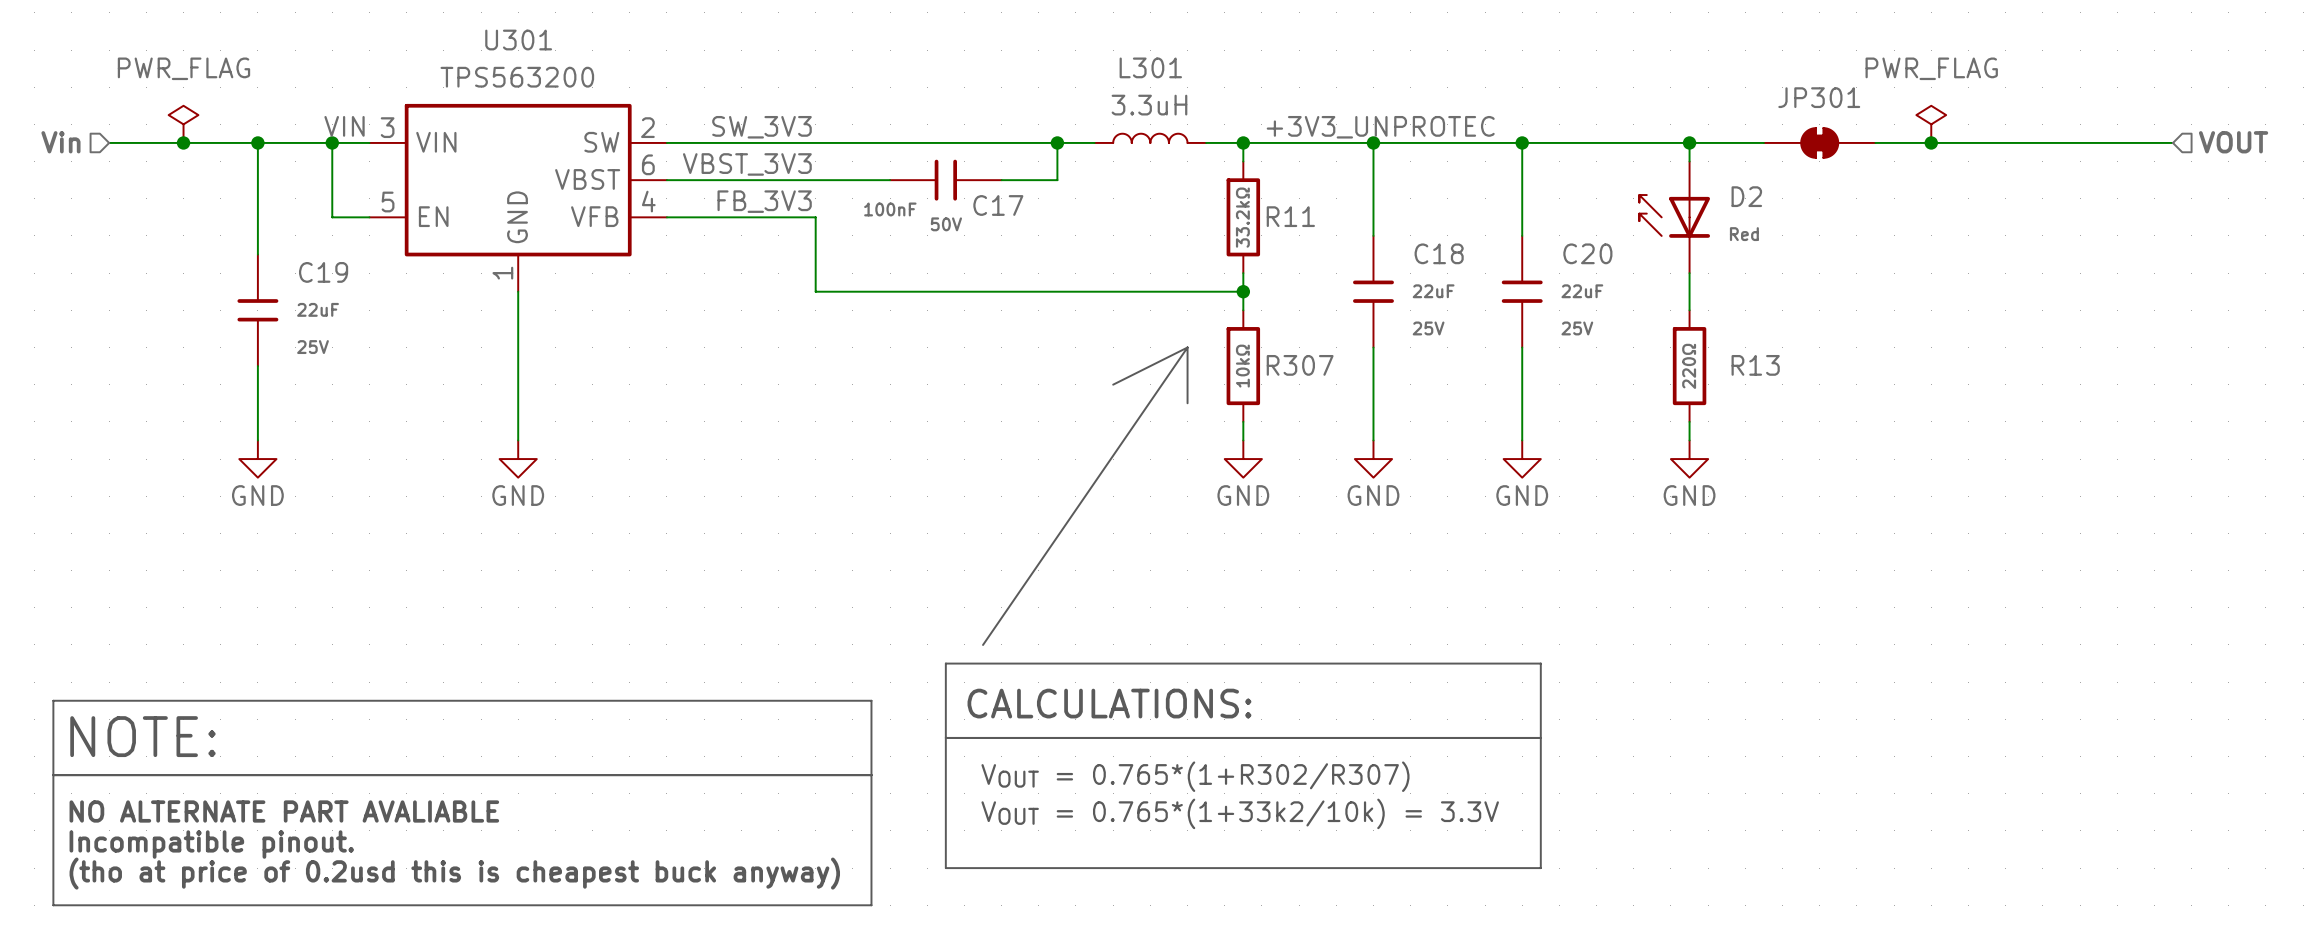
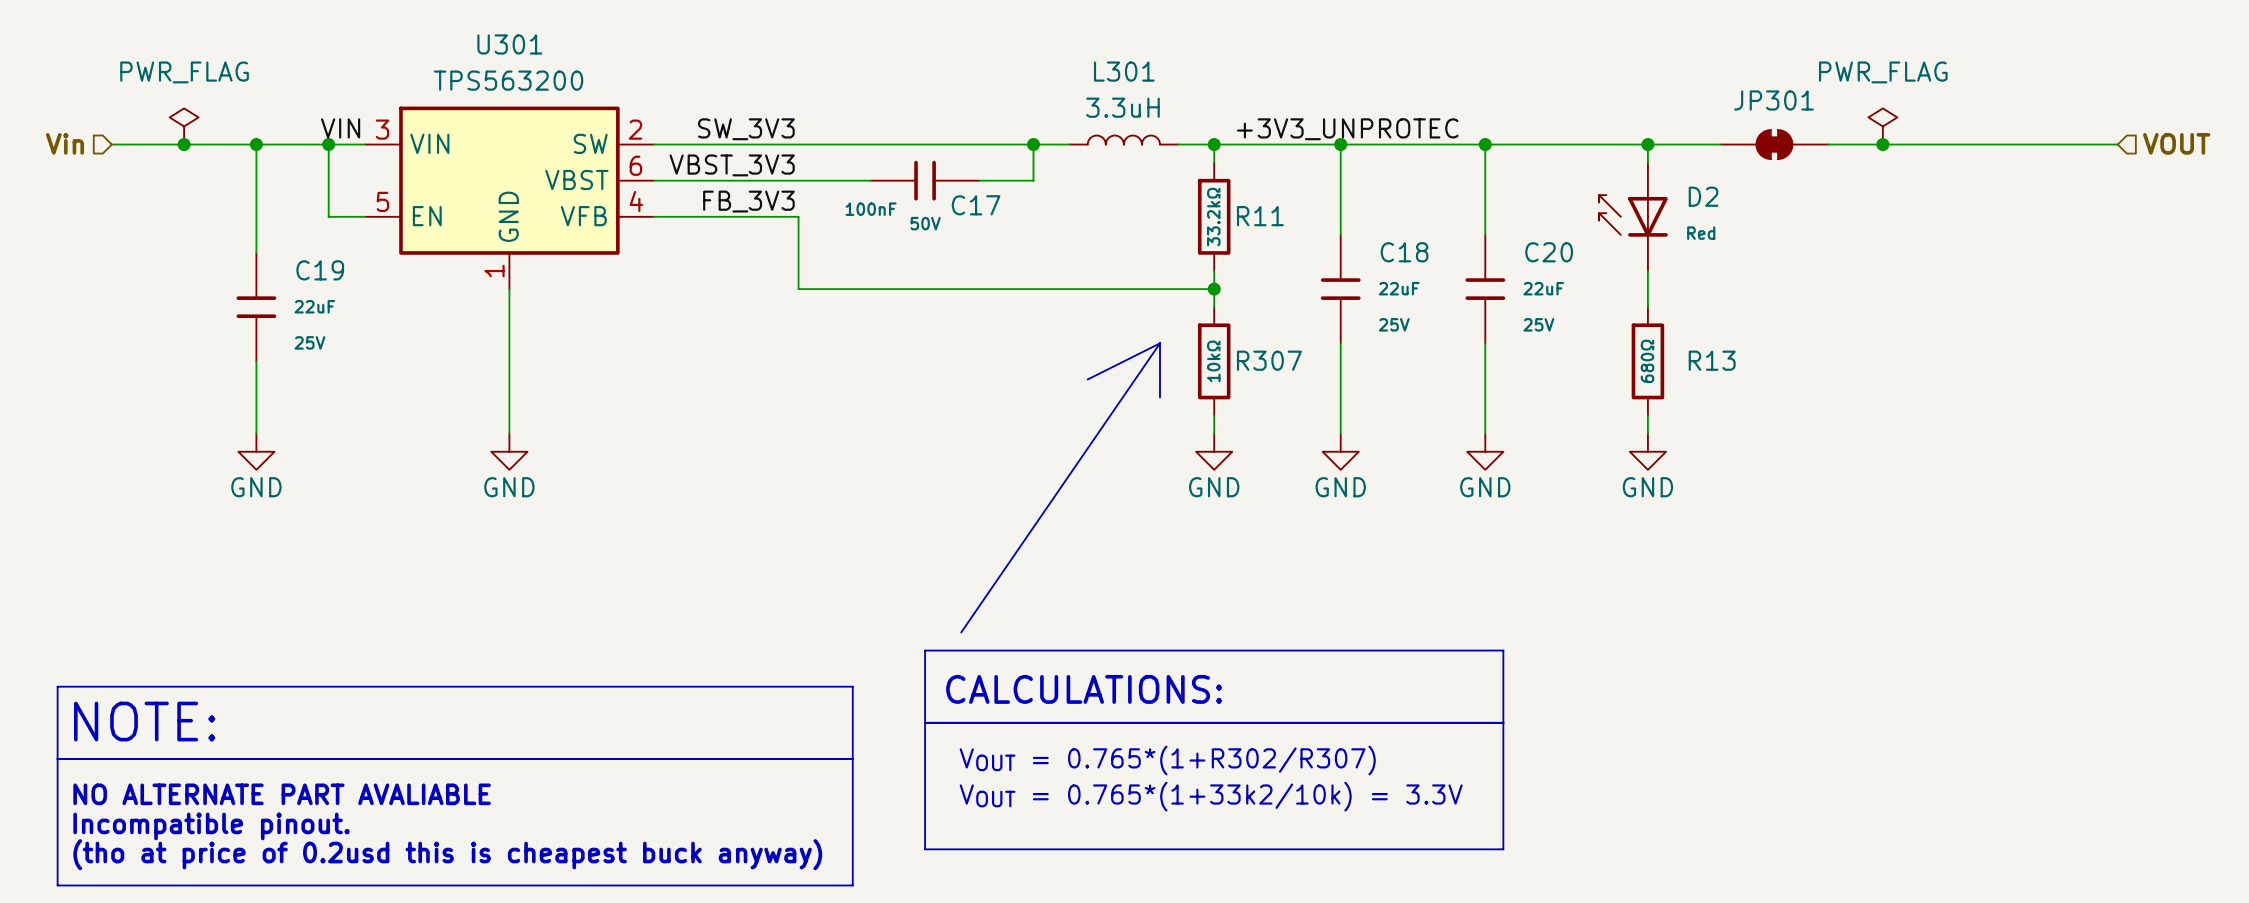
R13 value: 220Ω (1689, 366) -> 680Ω (1647, 361)

